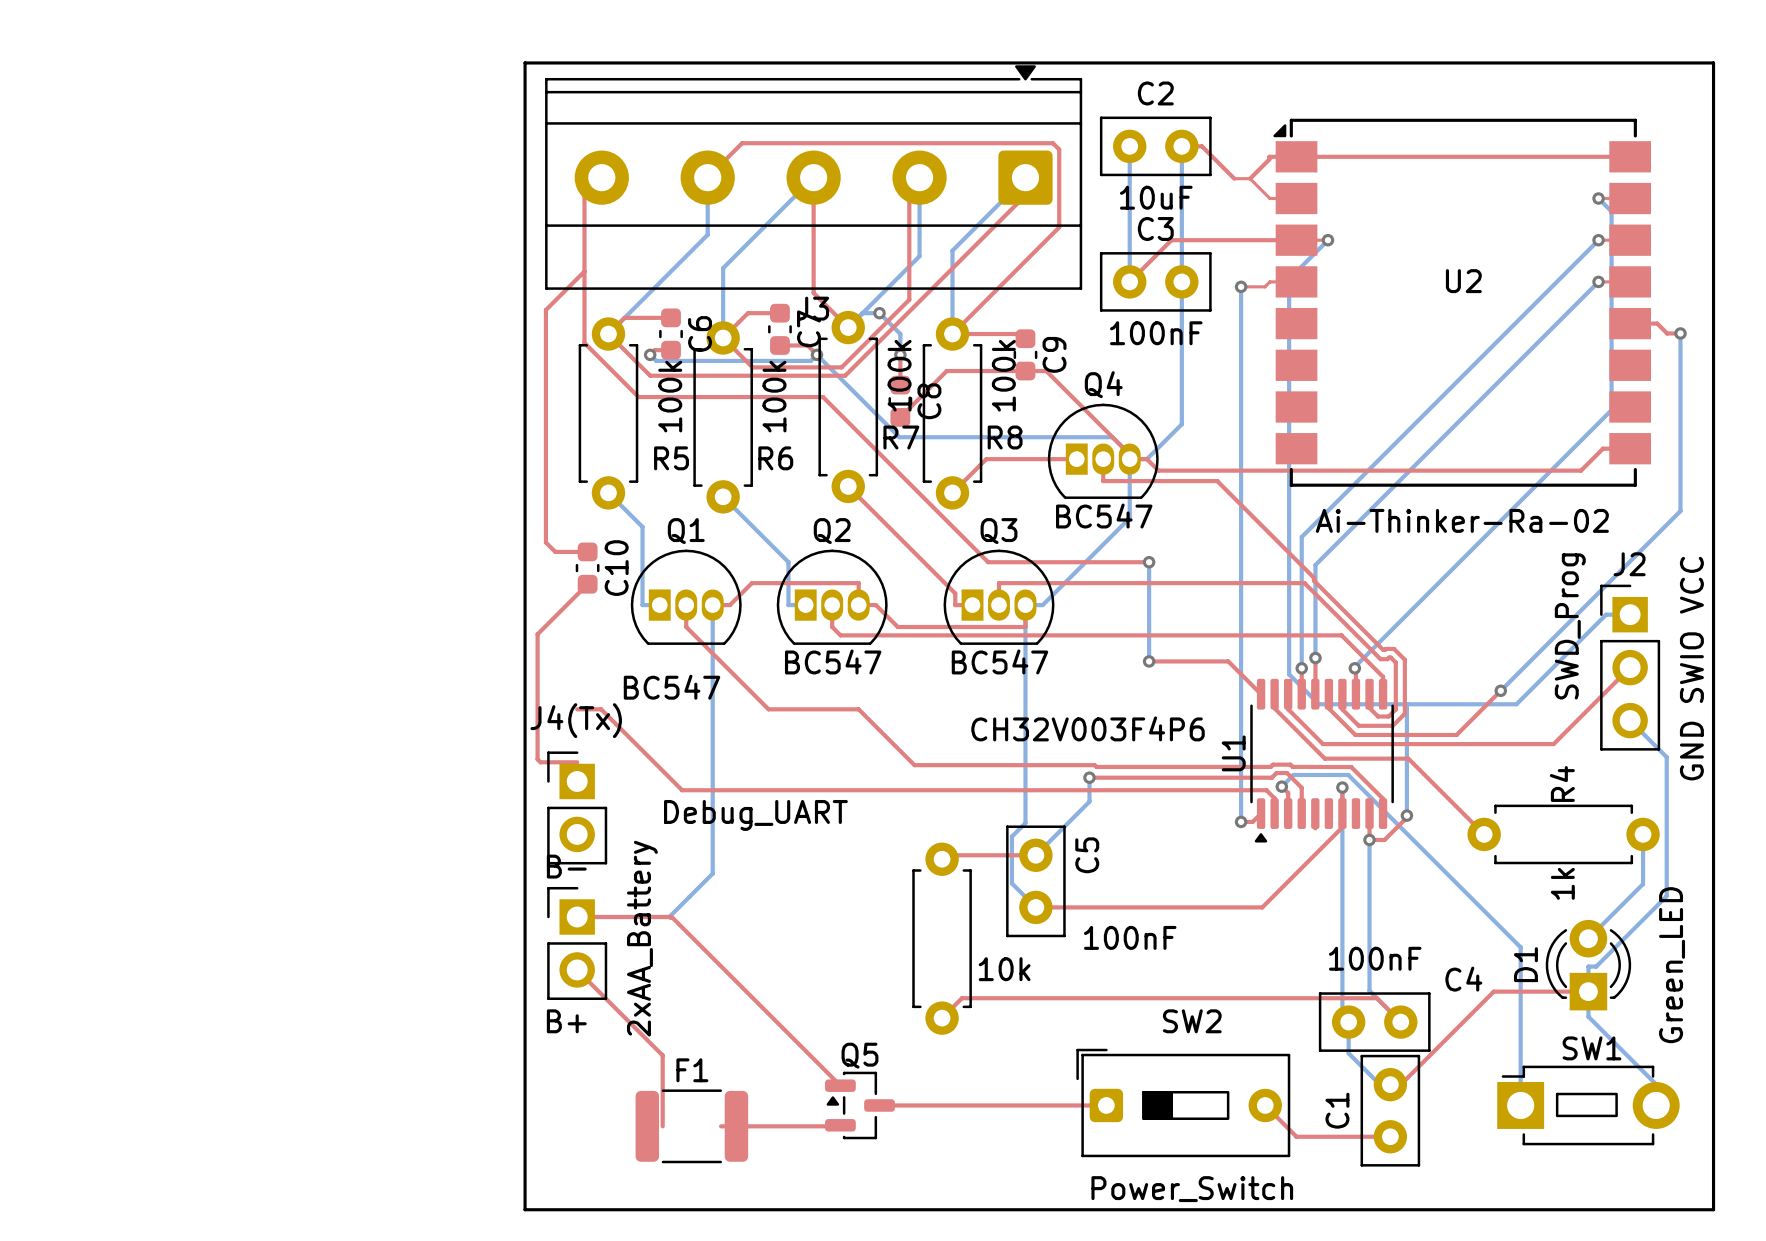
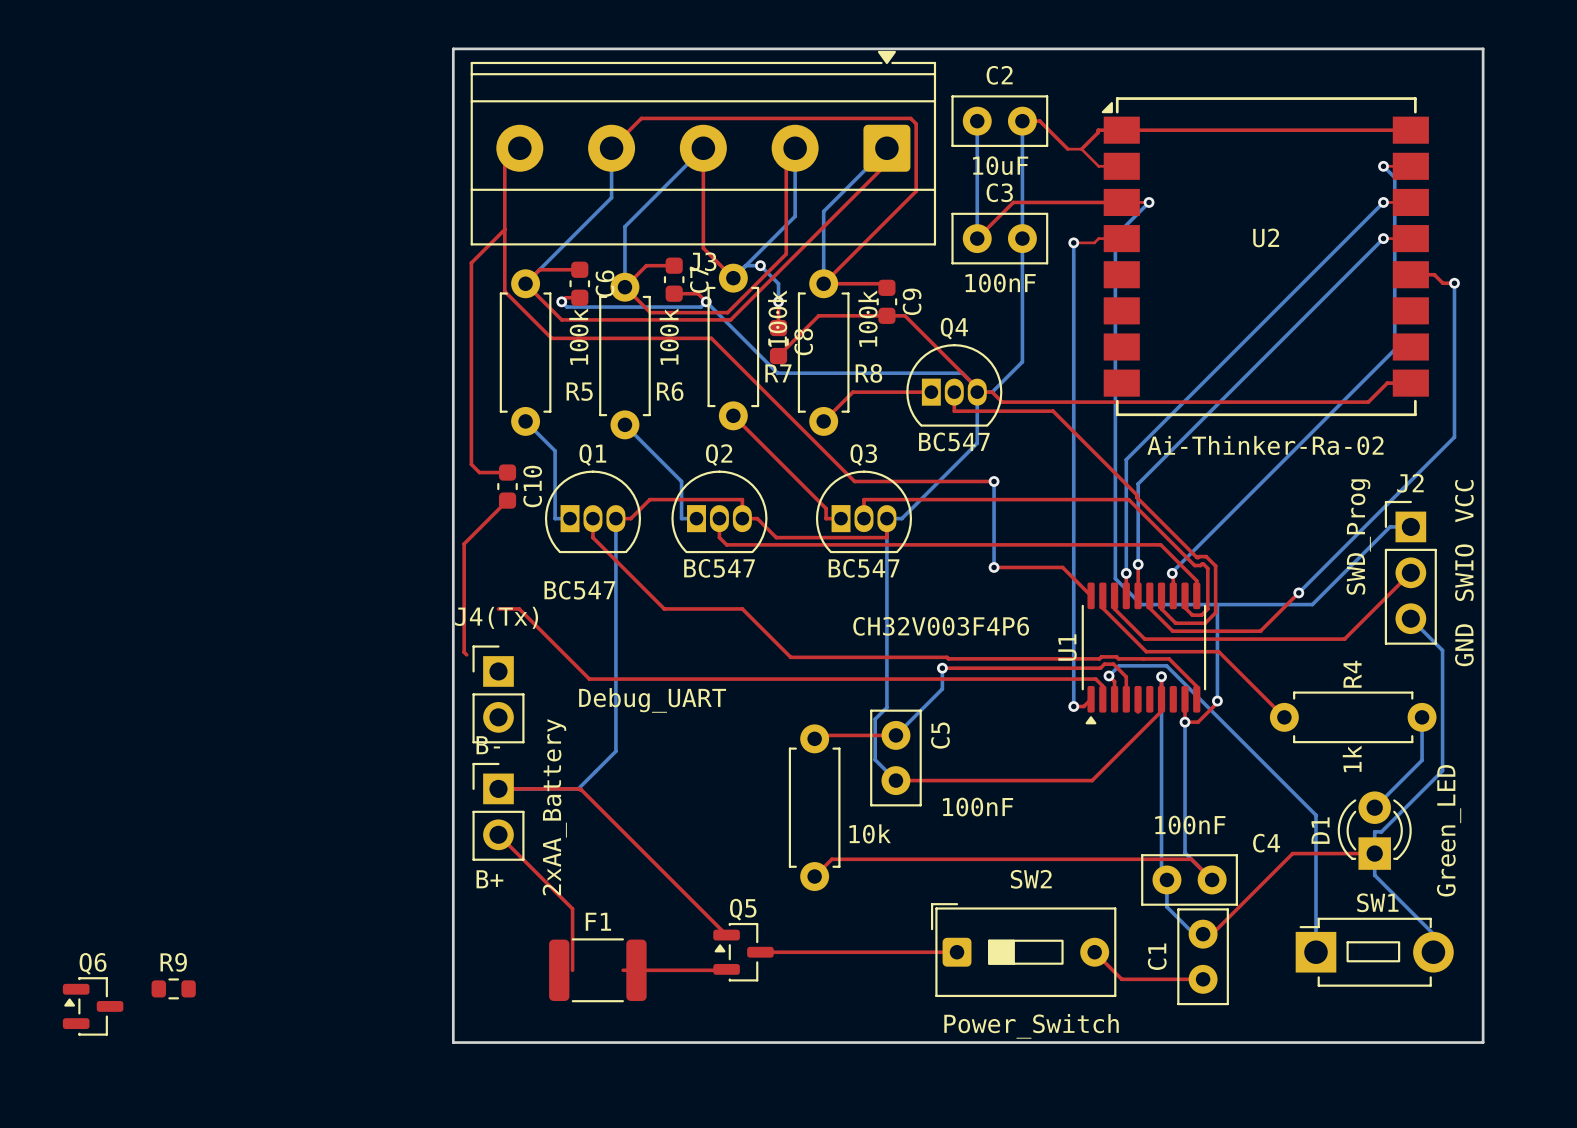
top track: (540, 762) (577, 762) -> none
R9: none -> (173, 988)
Q6: none -> (93, 1006)

